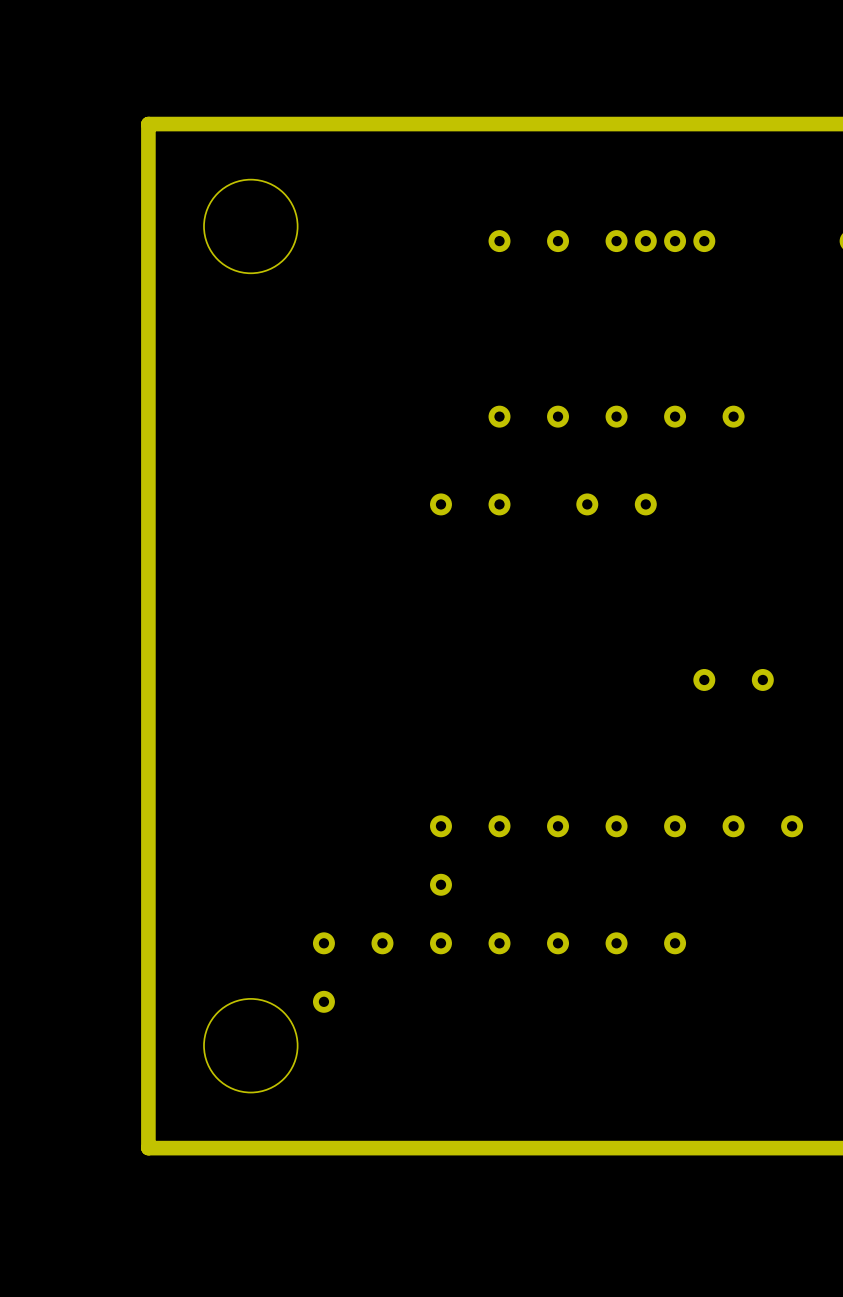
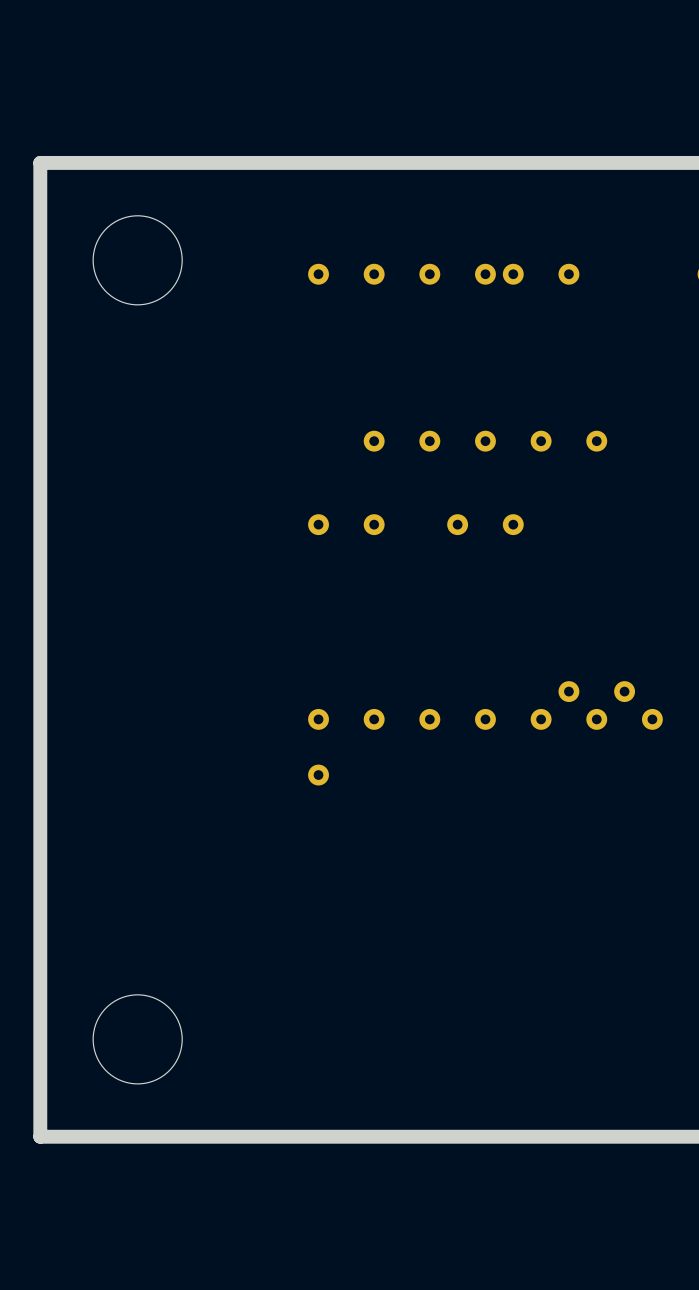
part position: (587, 241) -> (401, 274)
part position: (616, 855) -> (485, 747)
part: (499, 972) -> none

